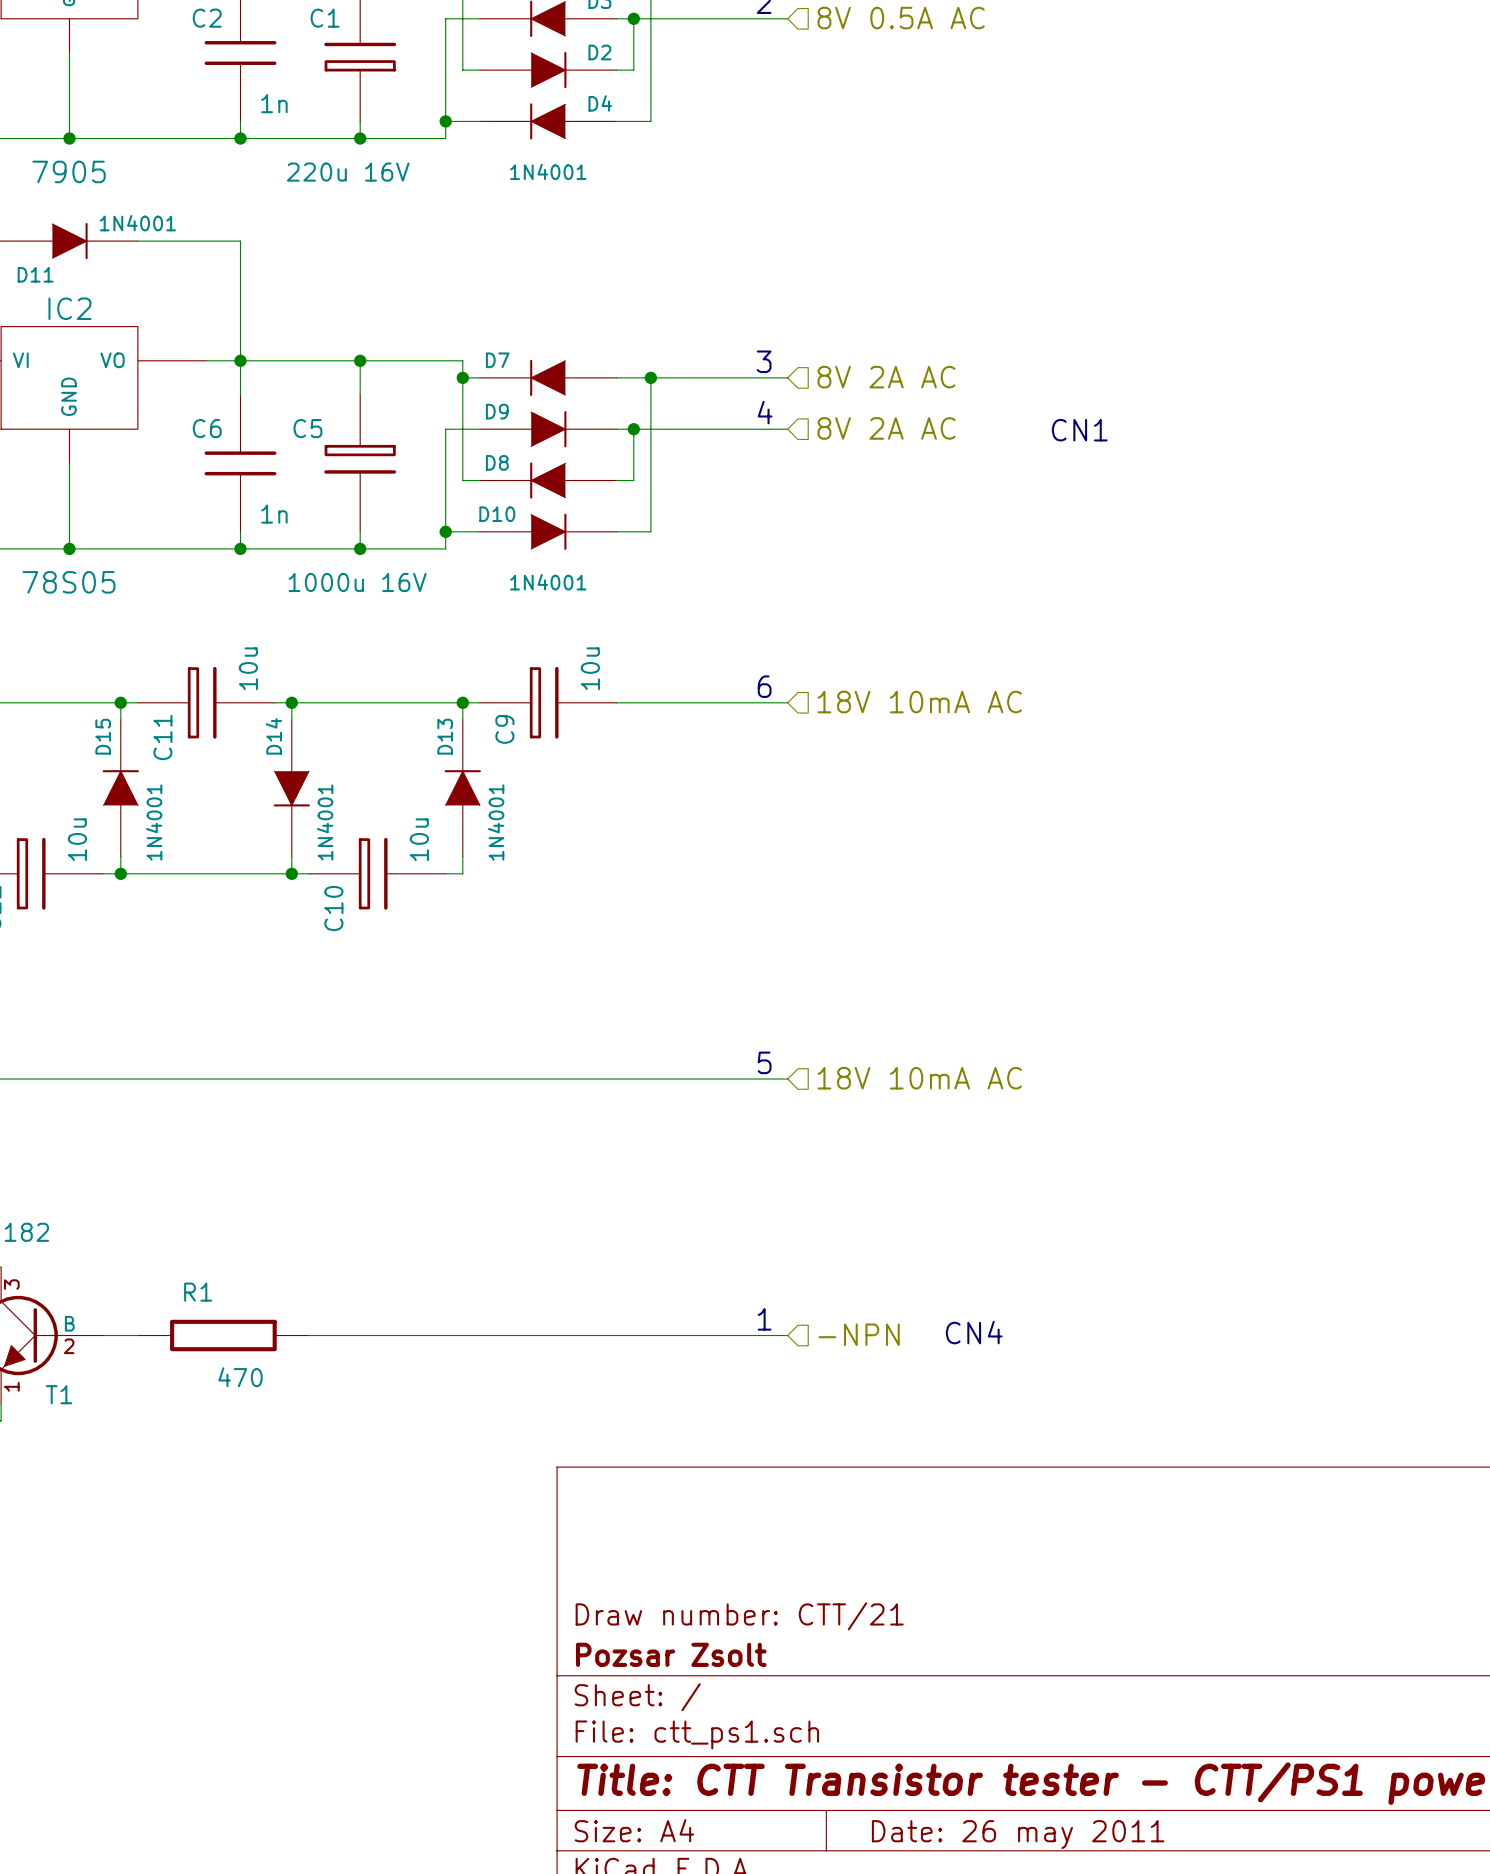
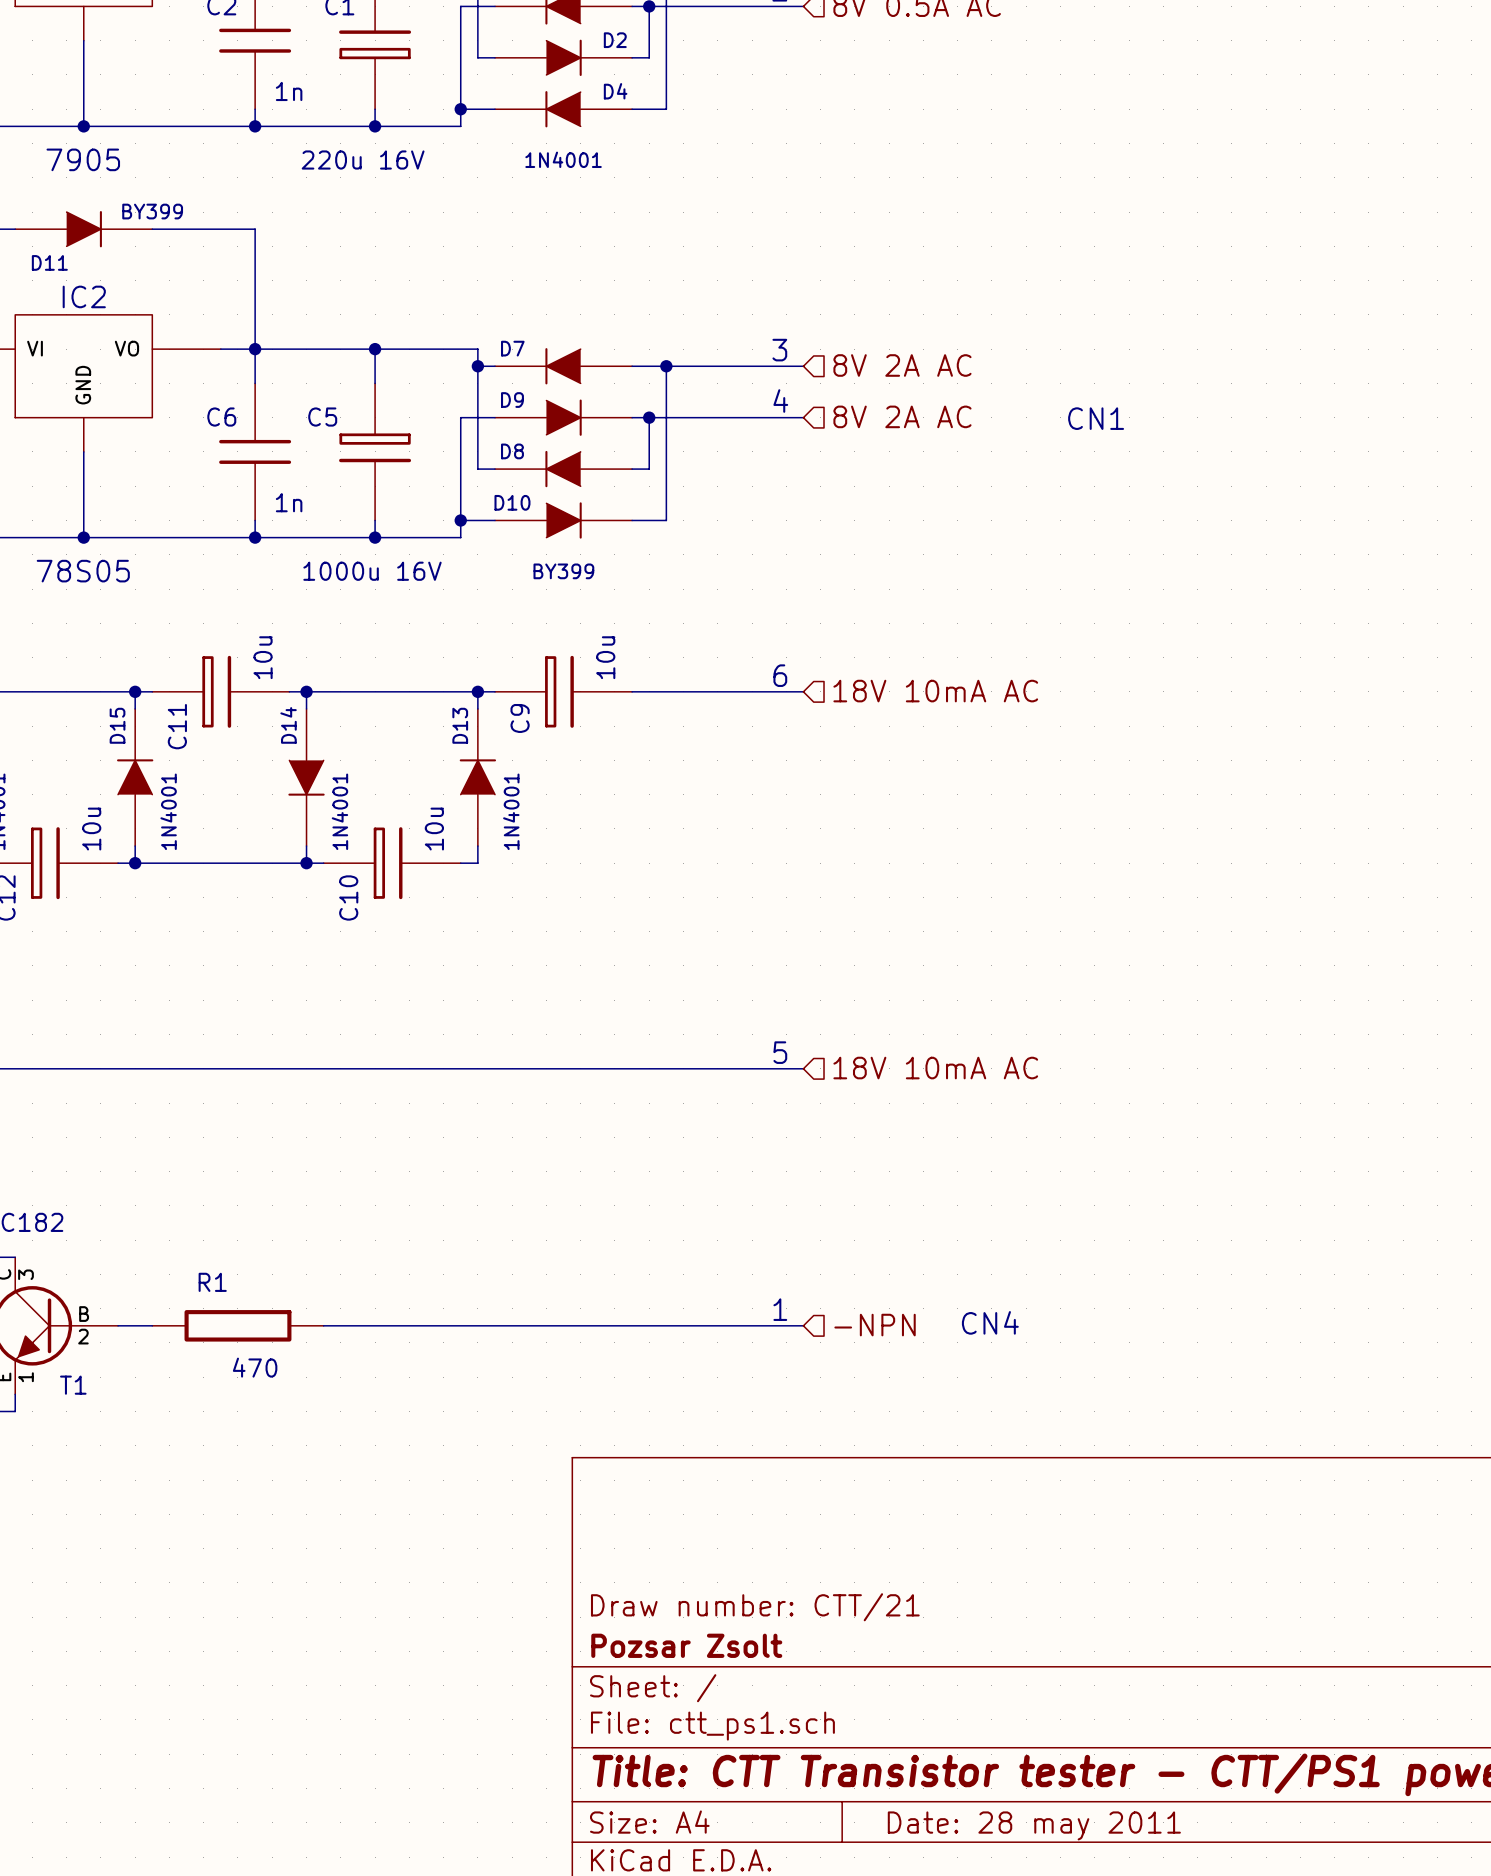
D11 value: 1N4001 (137, 223) -> BY399 (152, 211)
D7 value: 1N4001 (548, 582) -> BY399 (563, 571)
title block: Date: 26 may 2011 (1018, 1834) -> Date: 28 may 2011 (1034, 1825)

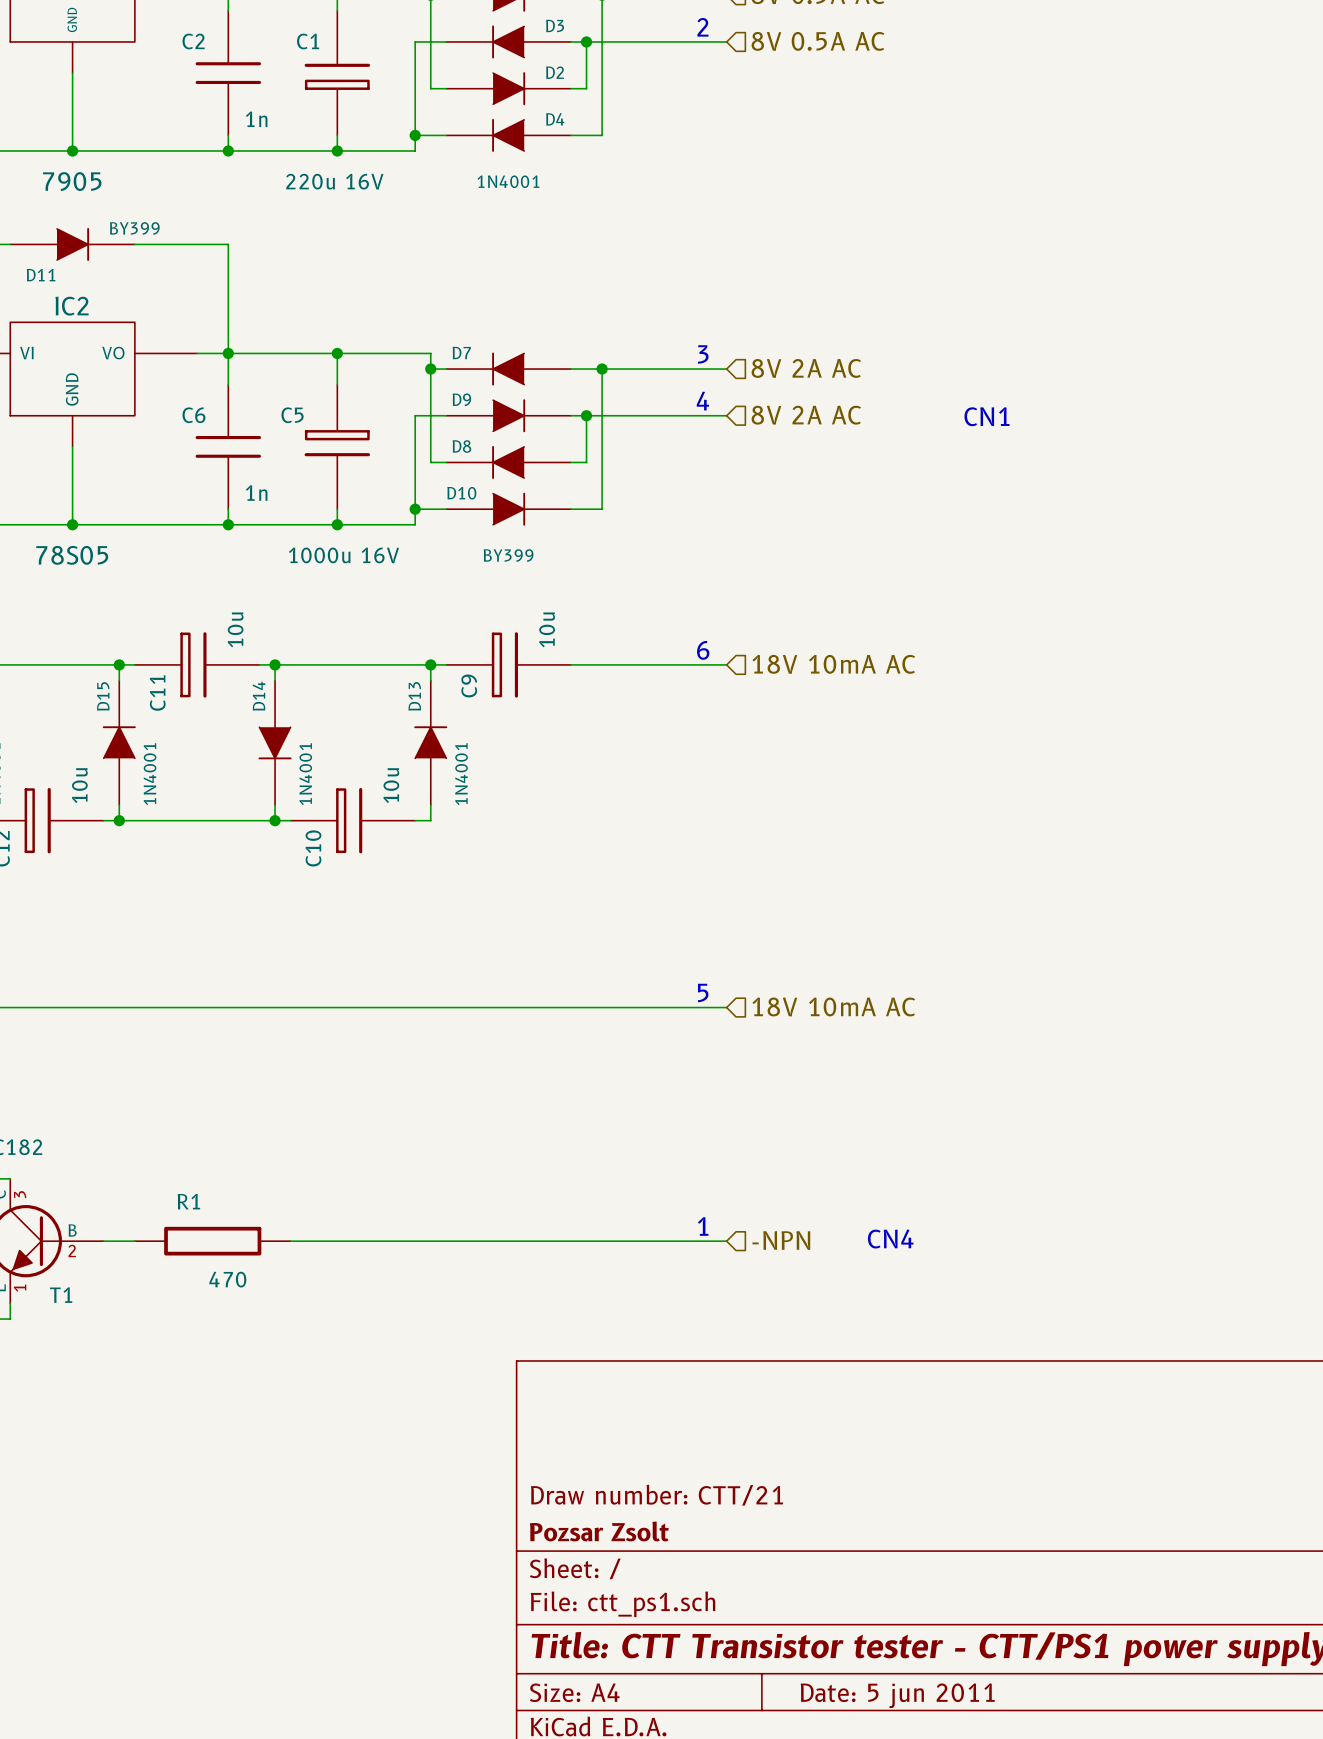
title block: Date: 28 may 2011 (1034, 1825) -> Date: 5 jun 2011 (897, 1695)

